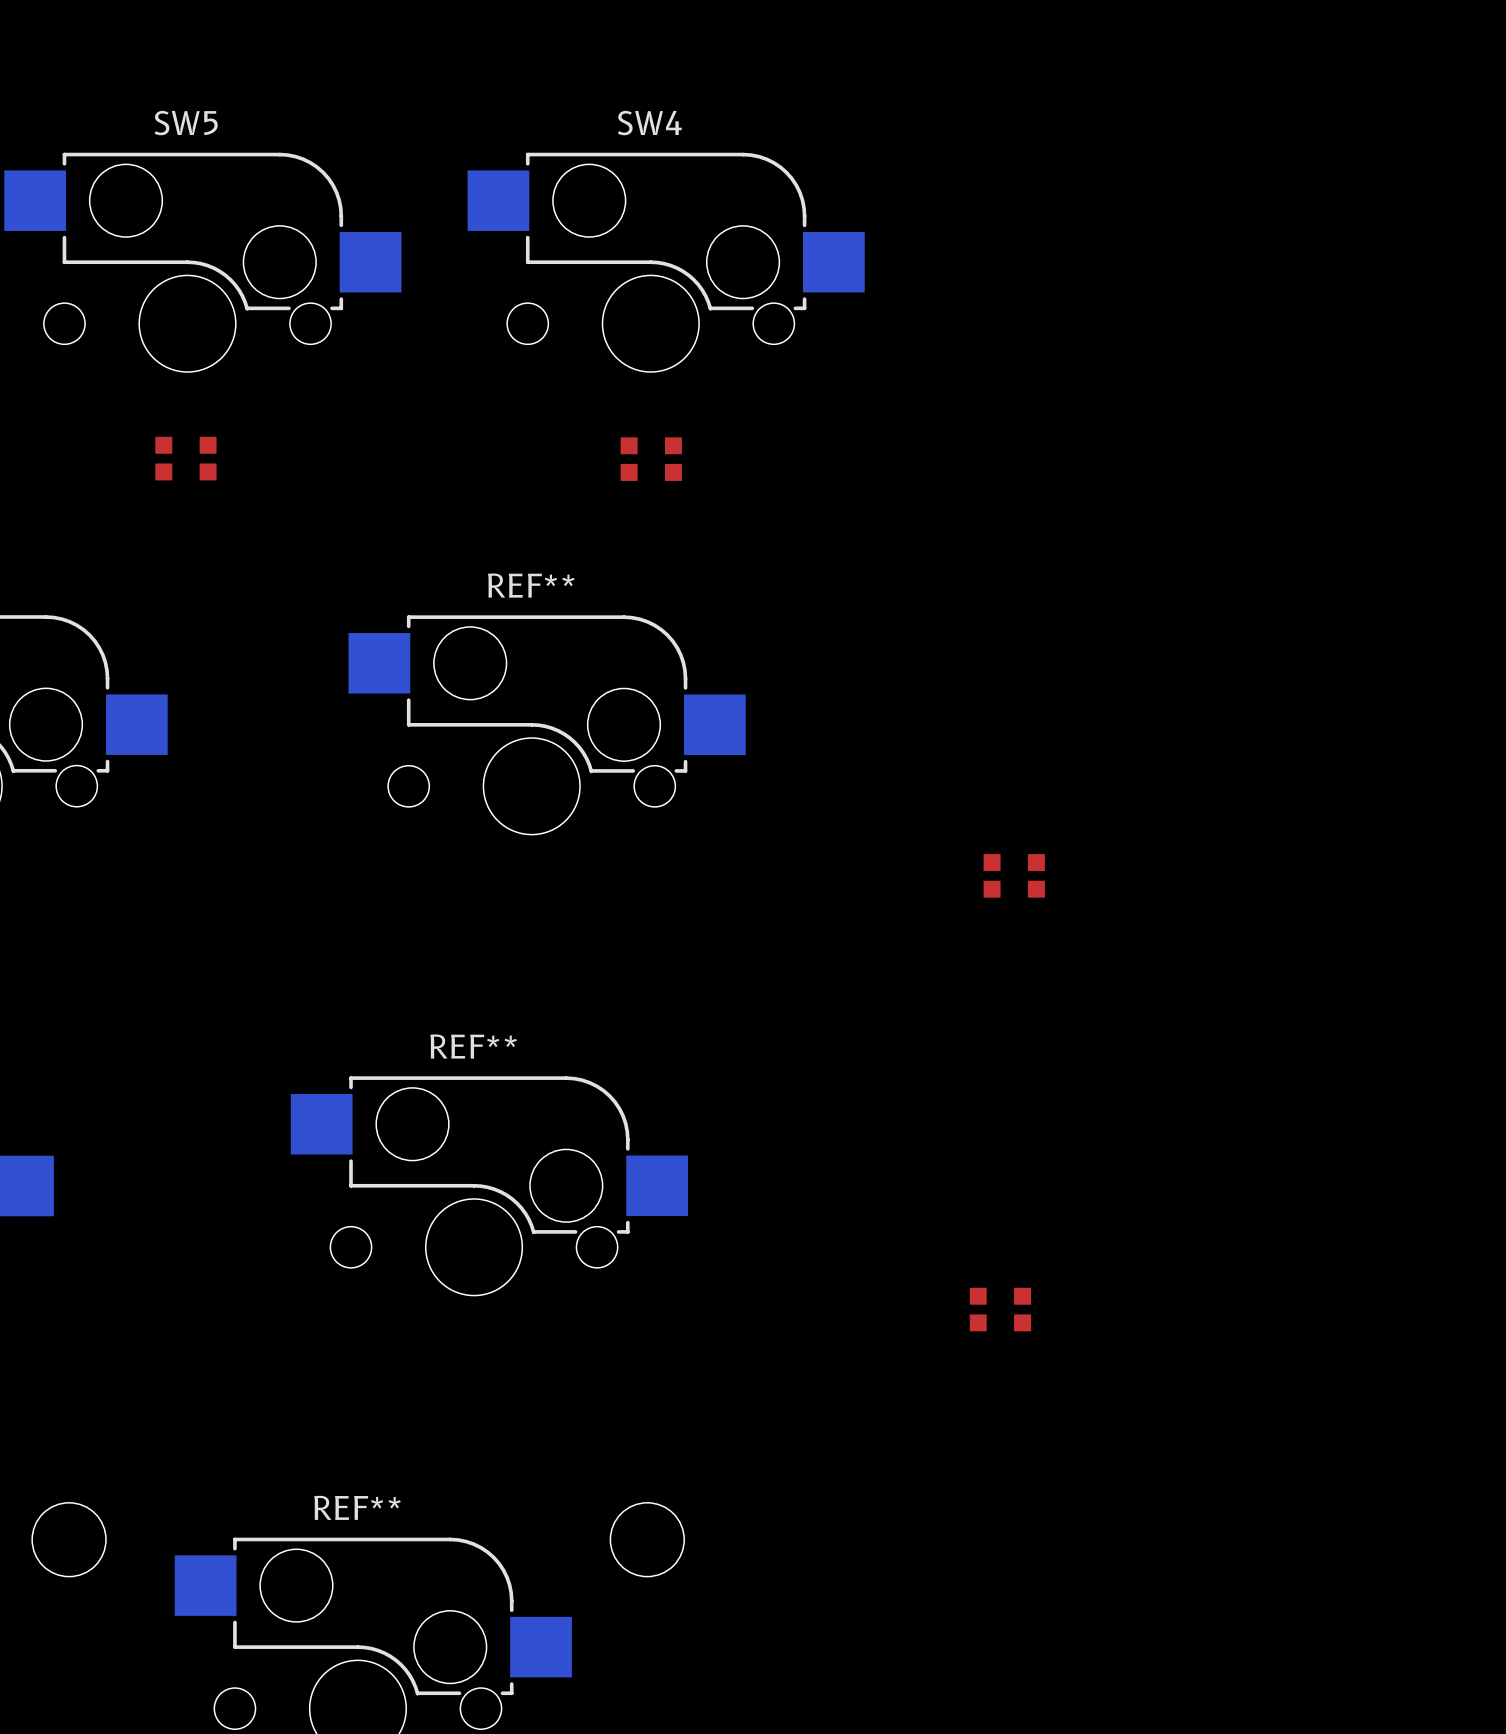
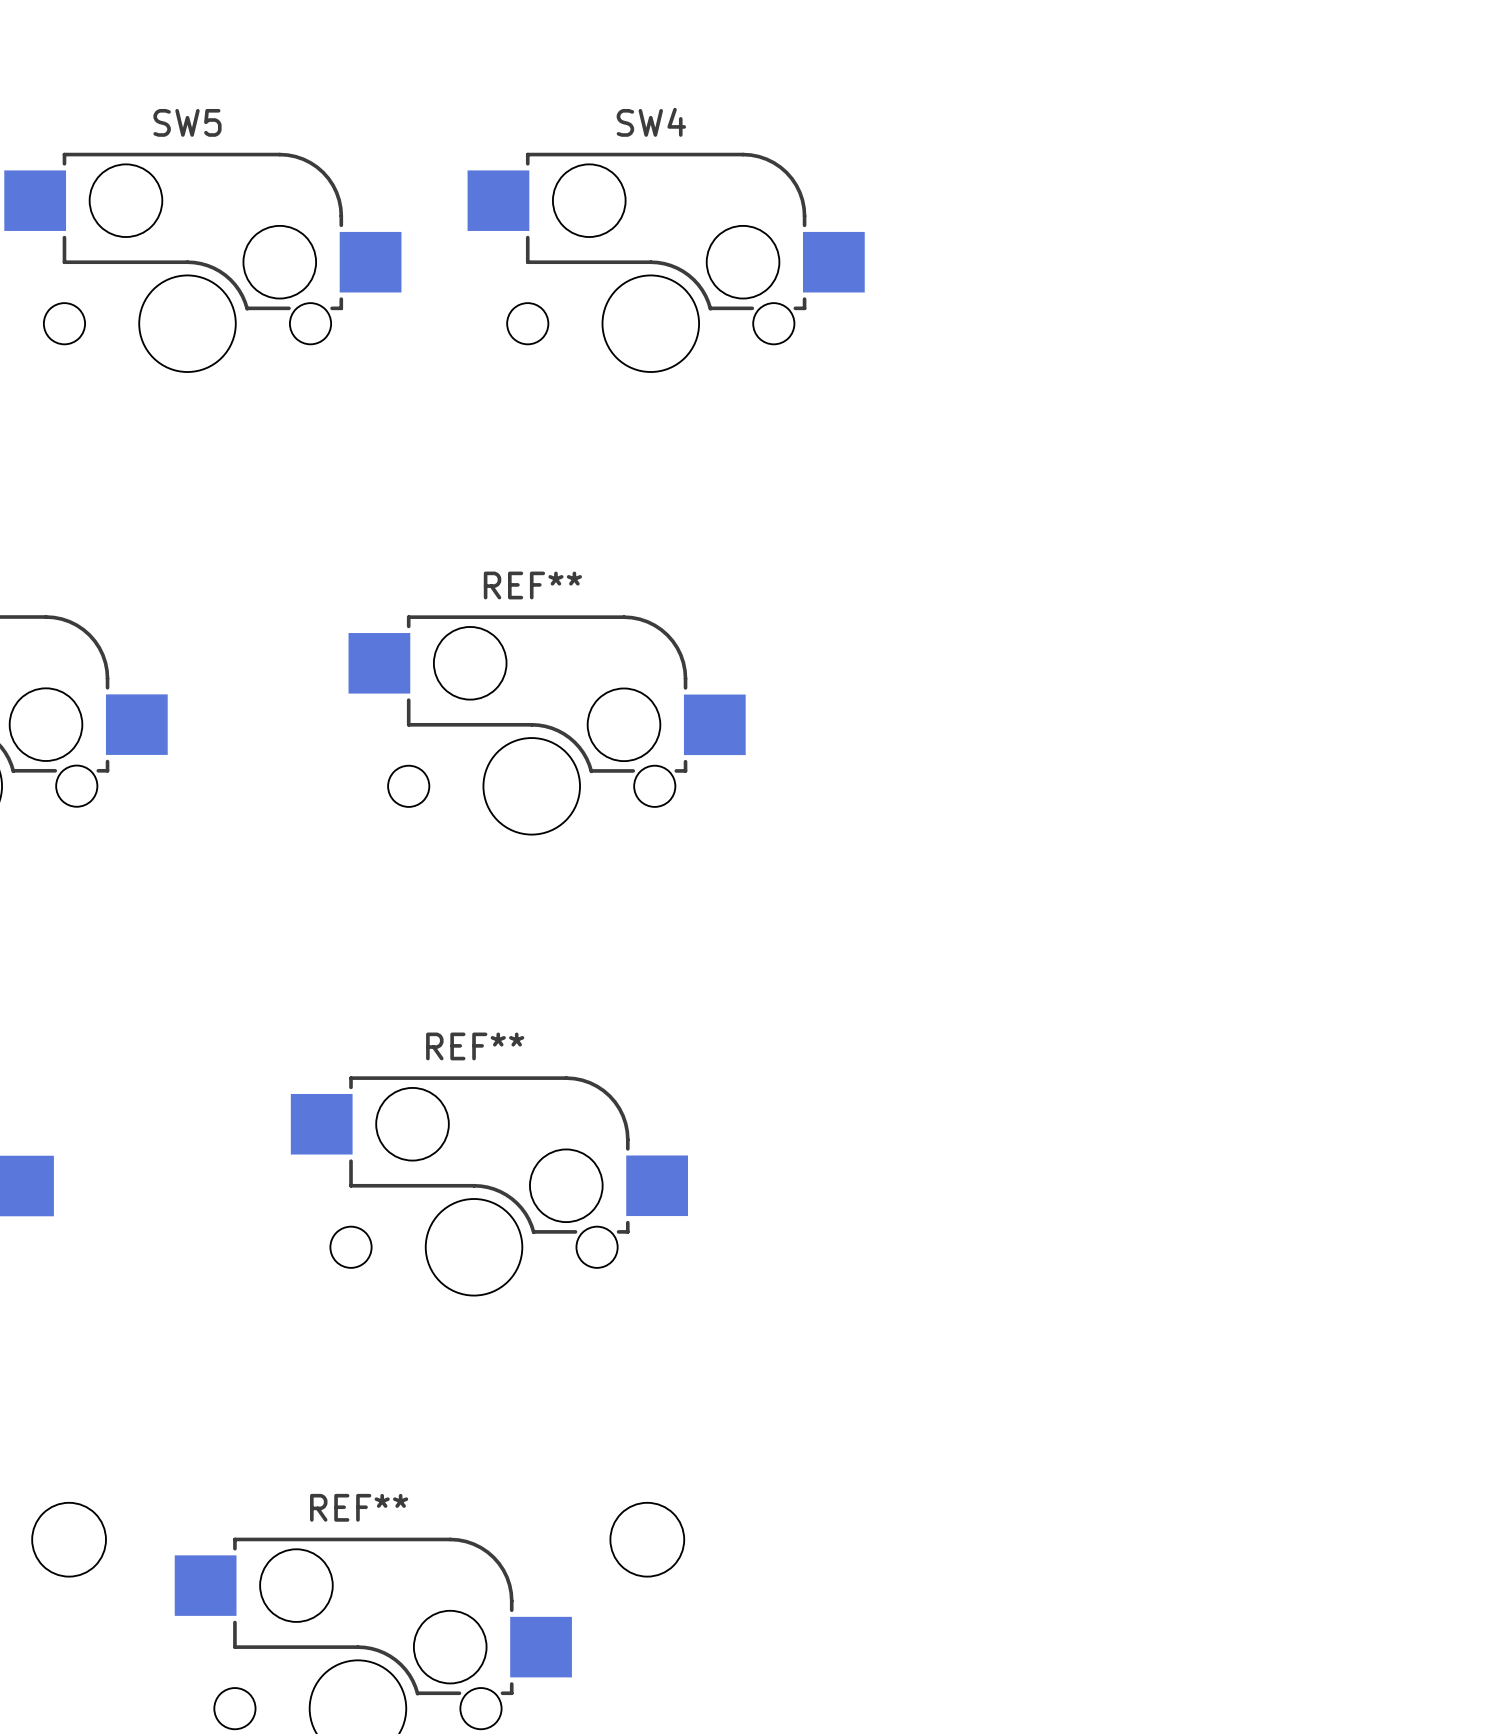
part: (185, 458) -> none
part: (651, 459) -> none
part: (1014, 875) -> none
part: (1000, 1309) -> none

